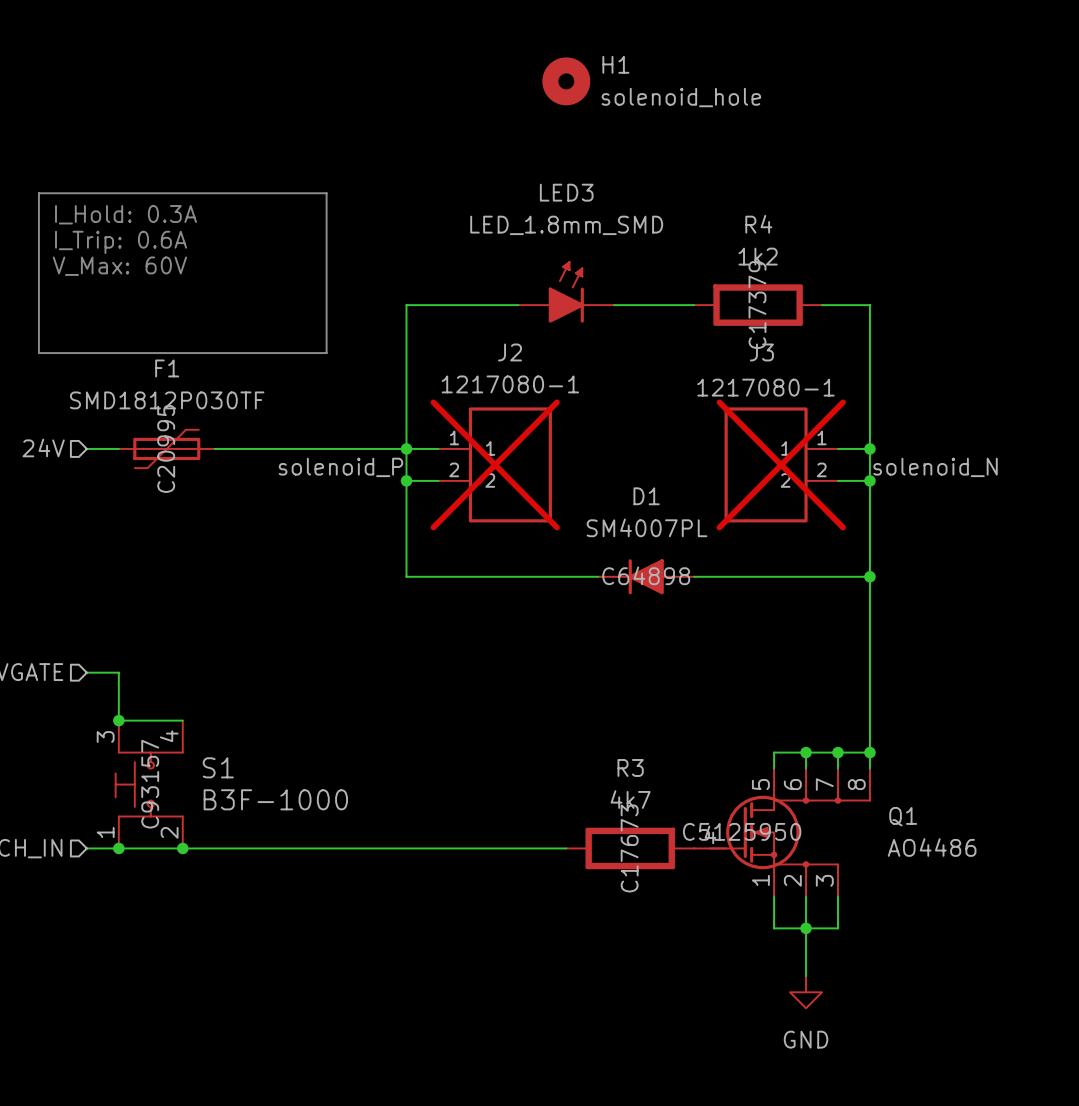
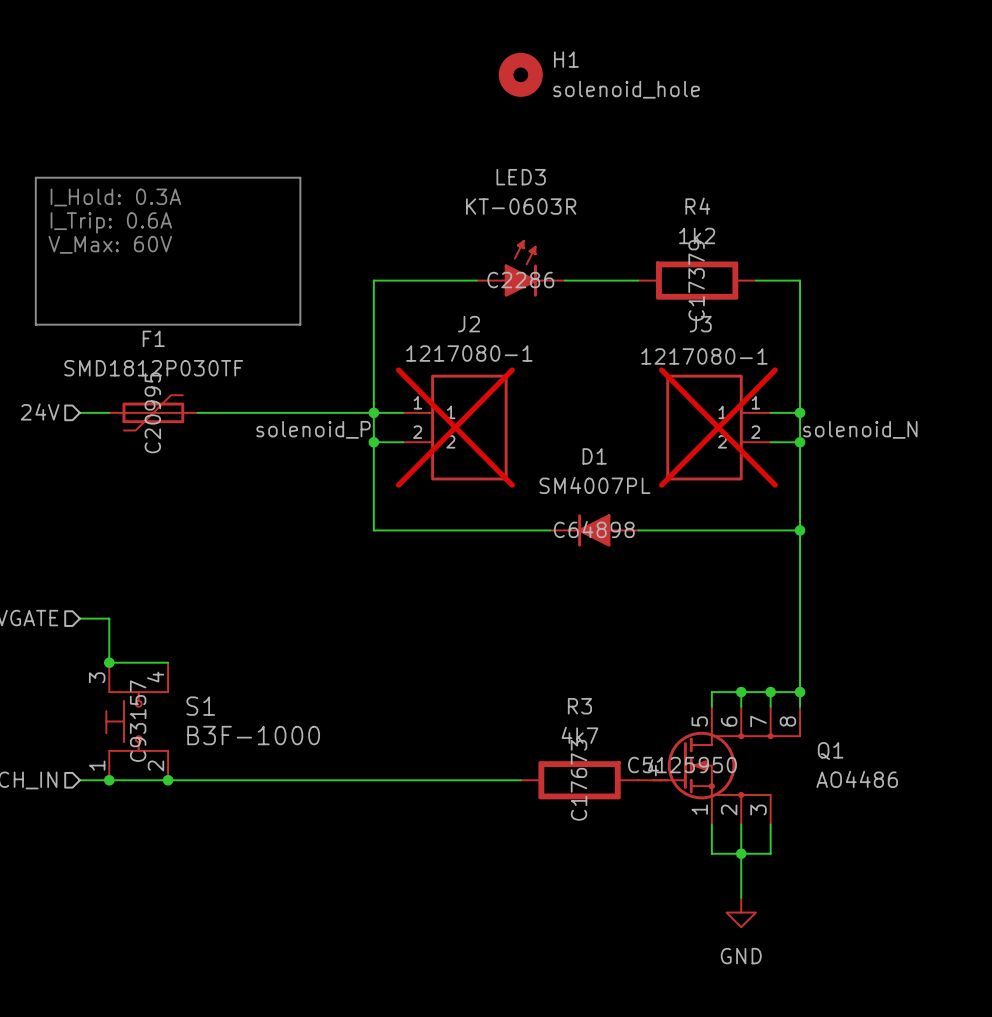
LED3 value: LED_1.8mm_SMD (566, 225) -> KT-0603R (521, 206)
LED3 text: none -> C2286 (520, 280)

